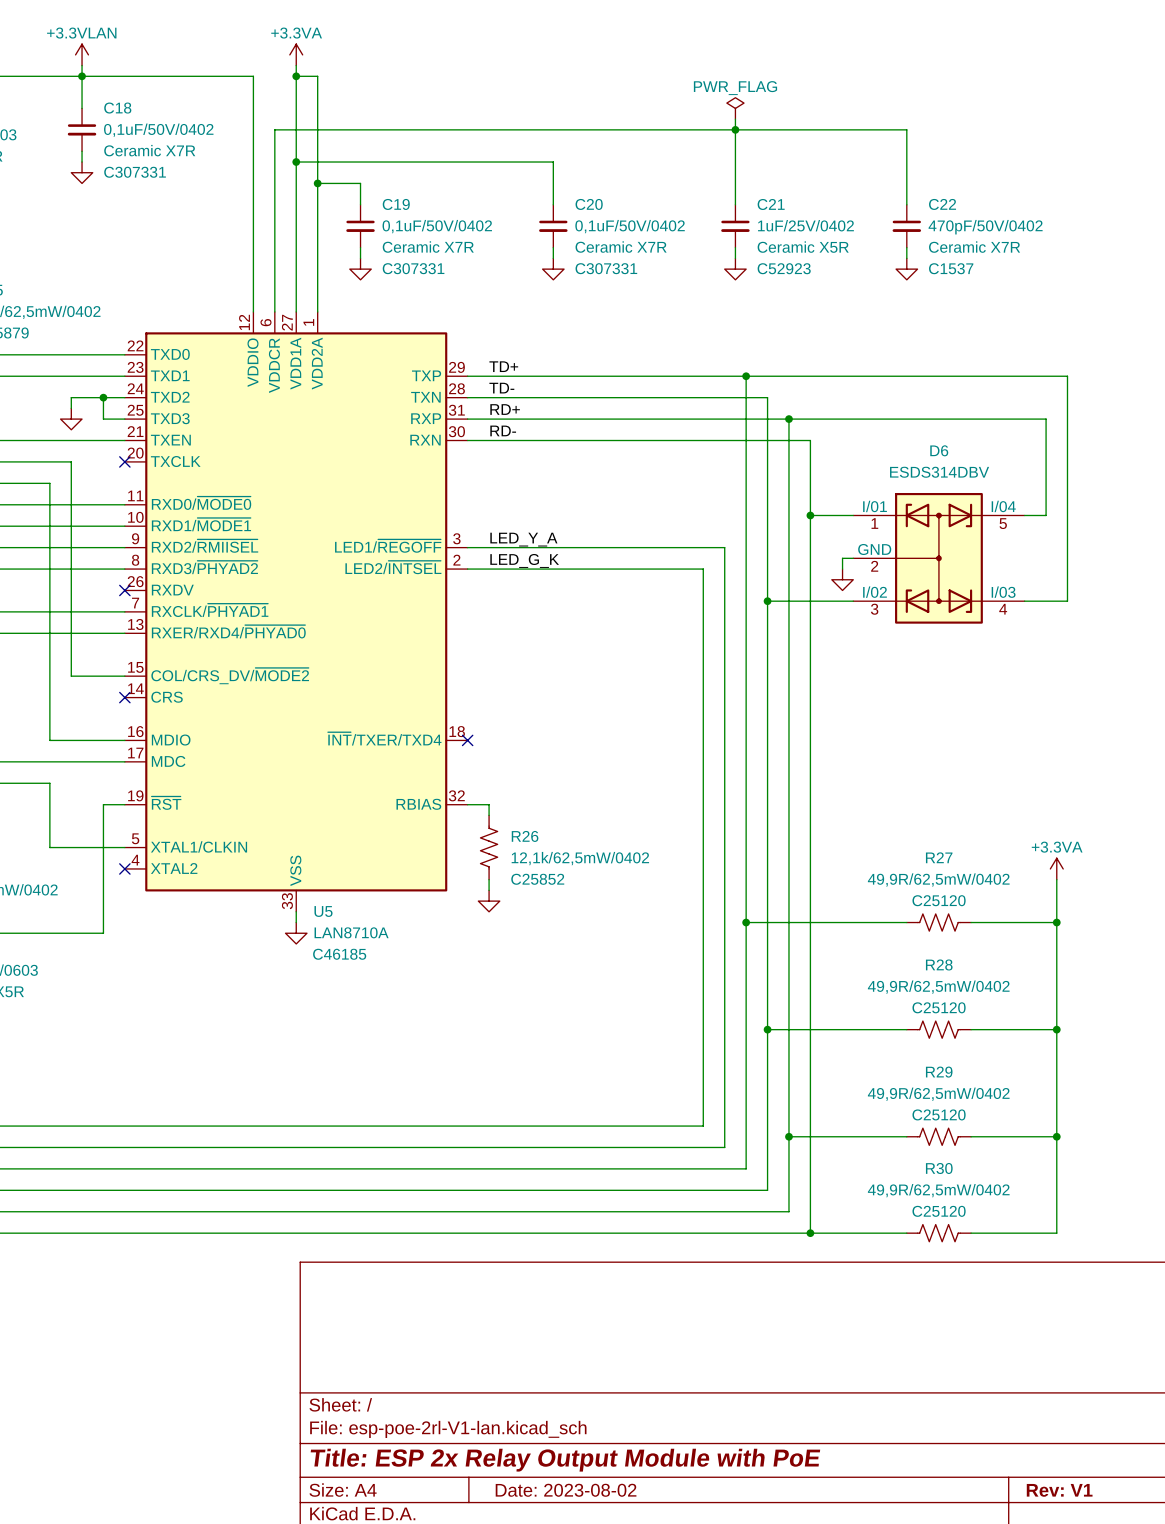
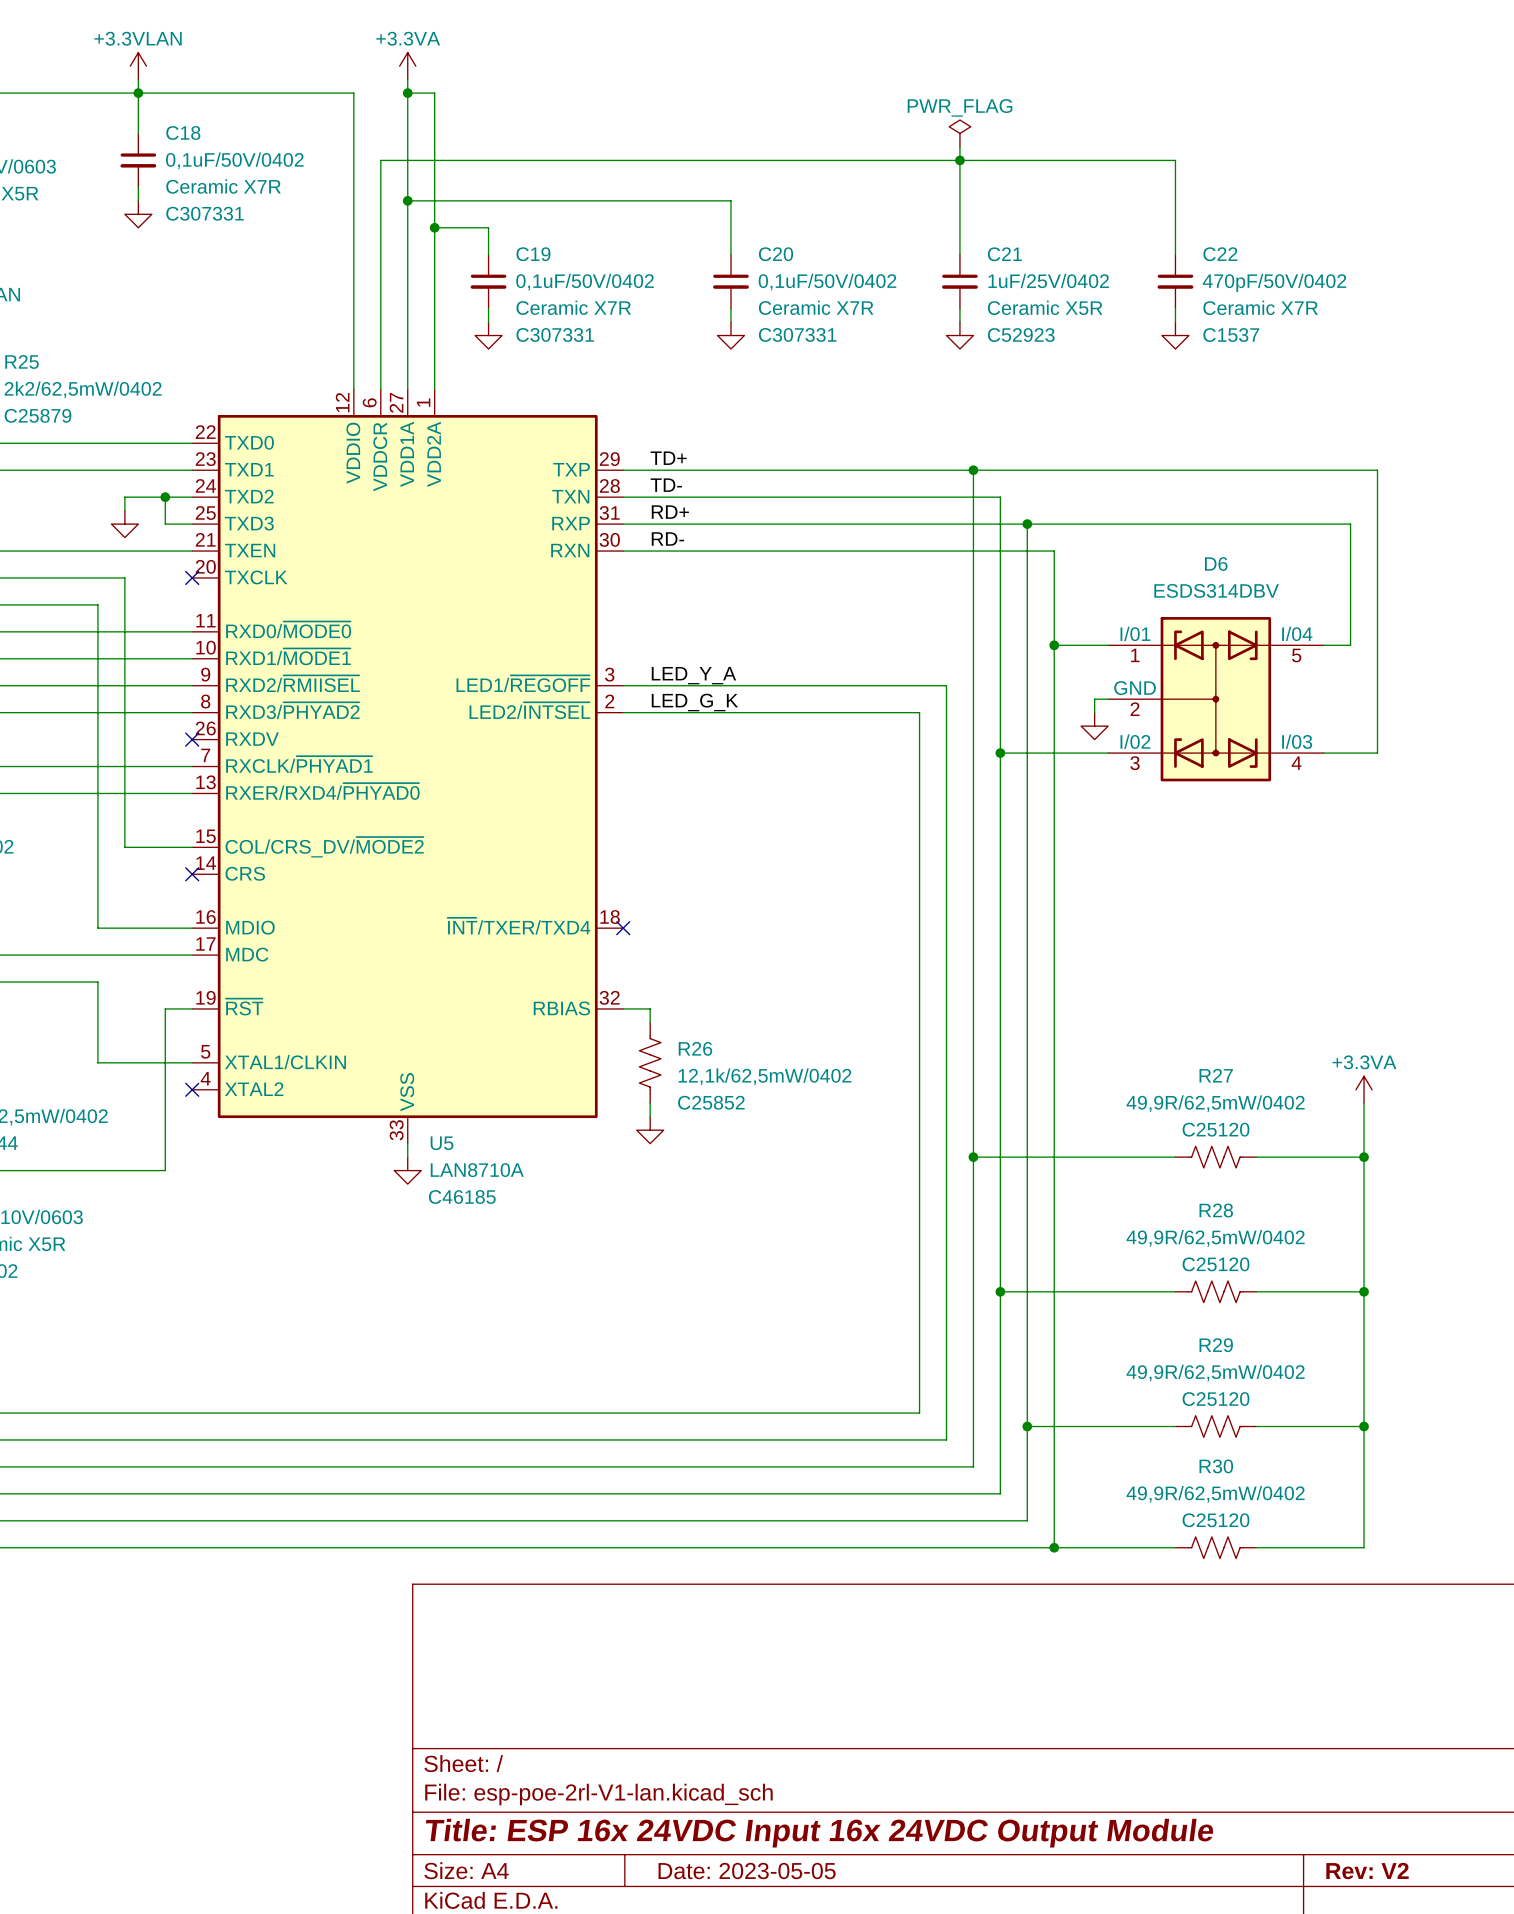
title block: Title: ESP 2x Relay Output Module with PoE (565, 1460) -> Title: ESP 16x 24VDC Input 16x 24VDC Output Module (819, 1833)
title block: Date: 2023-08-02 (566, 1490) -> Date: 2023-05-05 (747, 1871)
title block: Rev: V1 (1059, 1490) -> Rev: V2 (1367, 1871)

